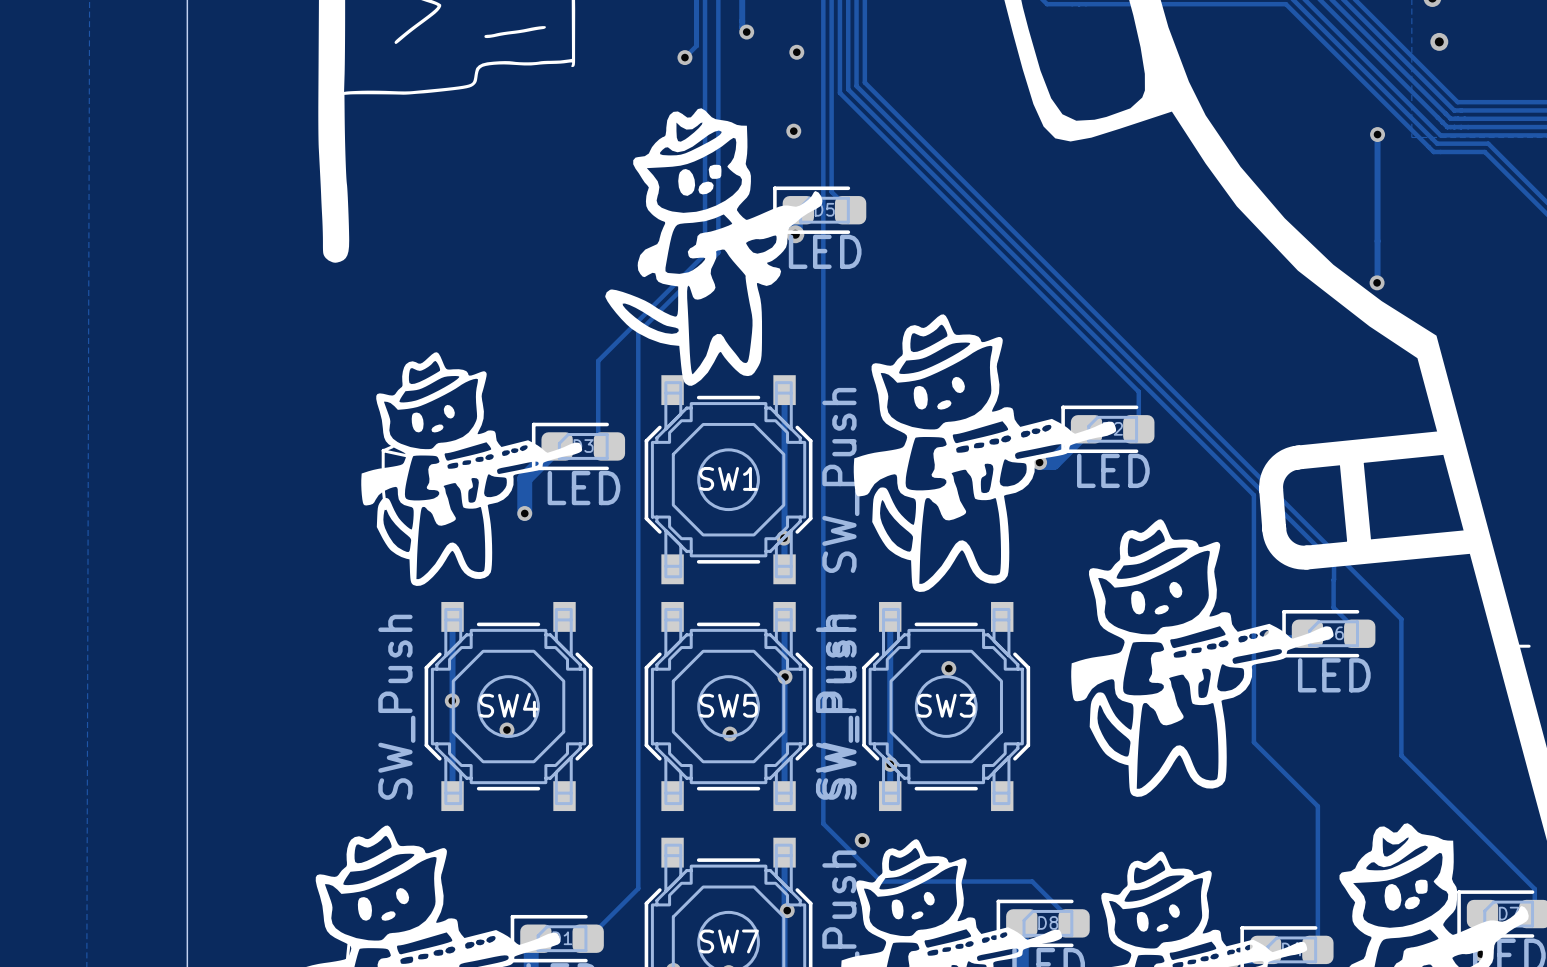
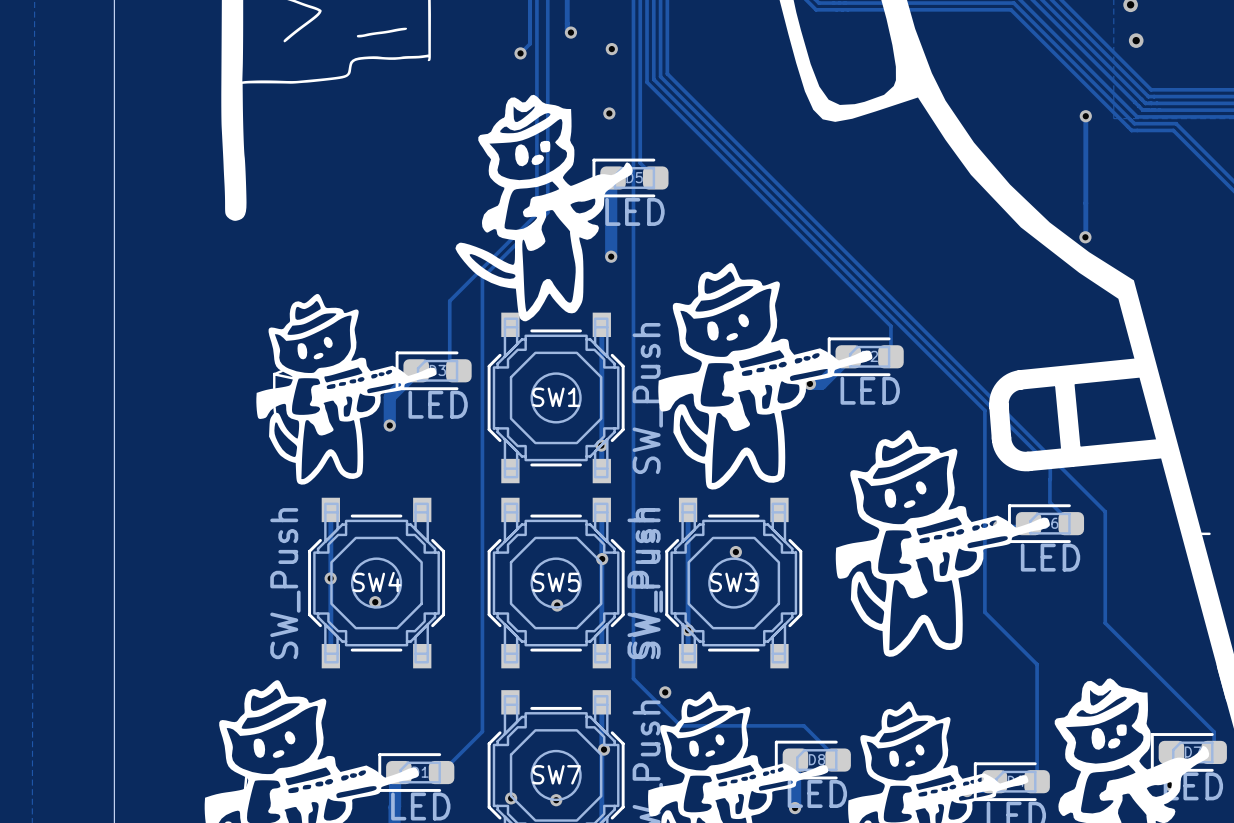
track: none -> (611, 178) (611, 256)
via: (795, 234) -> none
via: none -> (611, 256)

